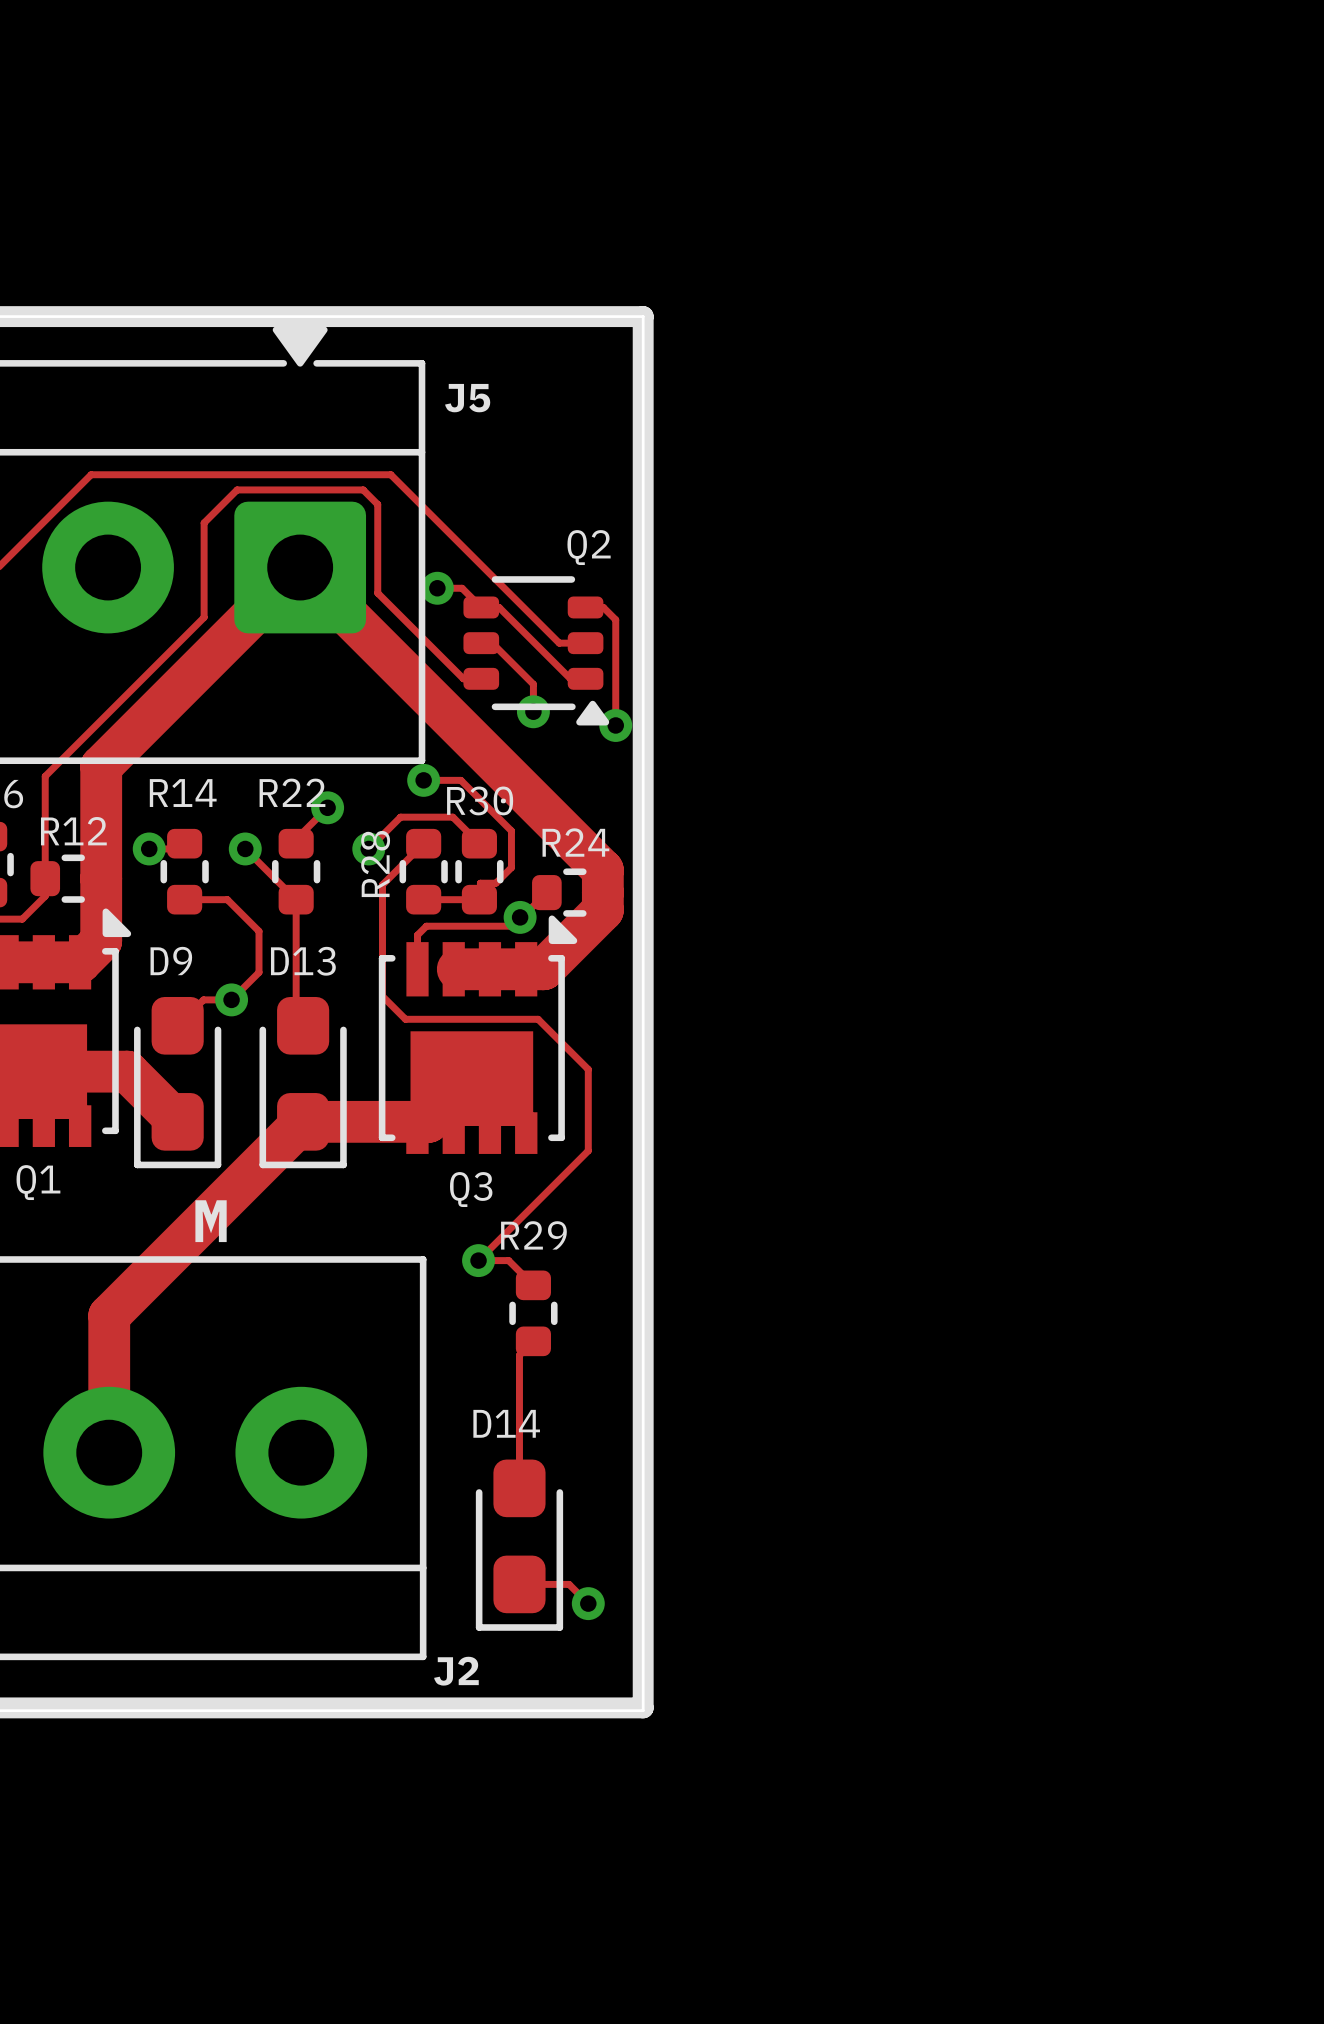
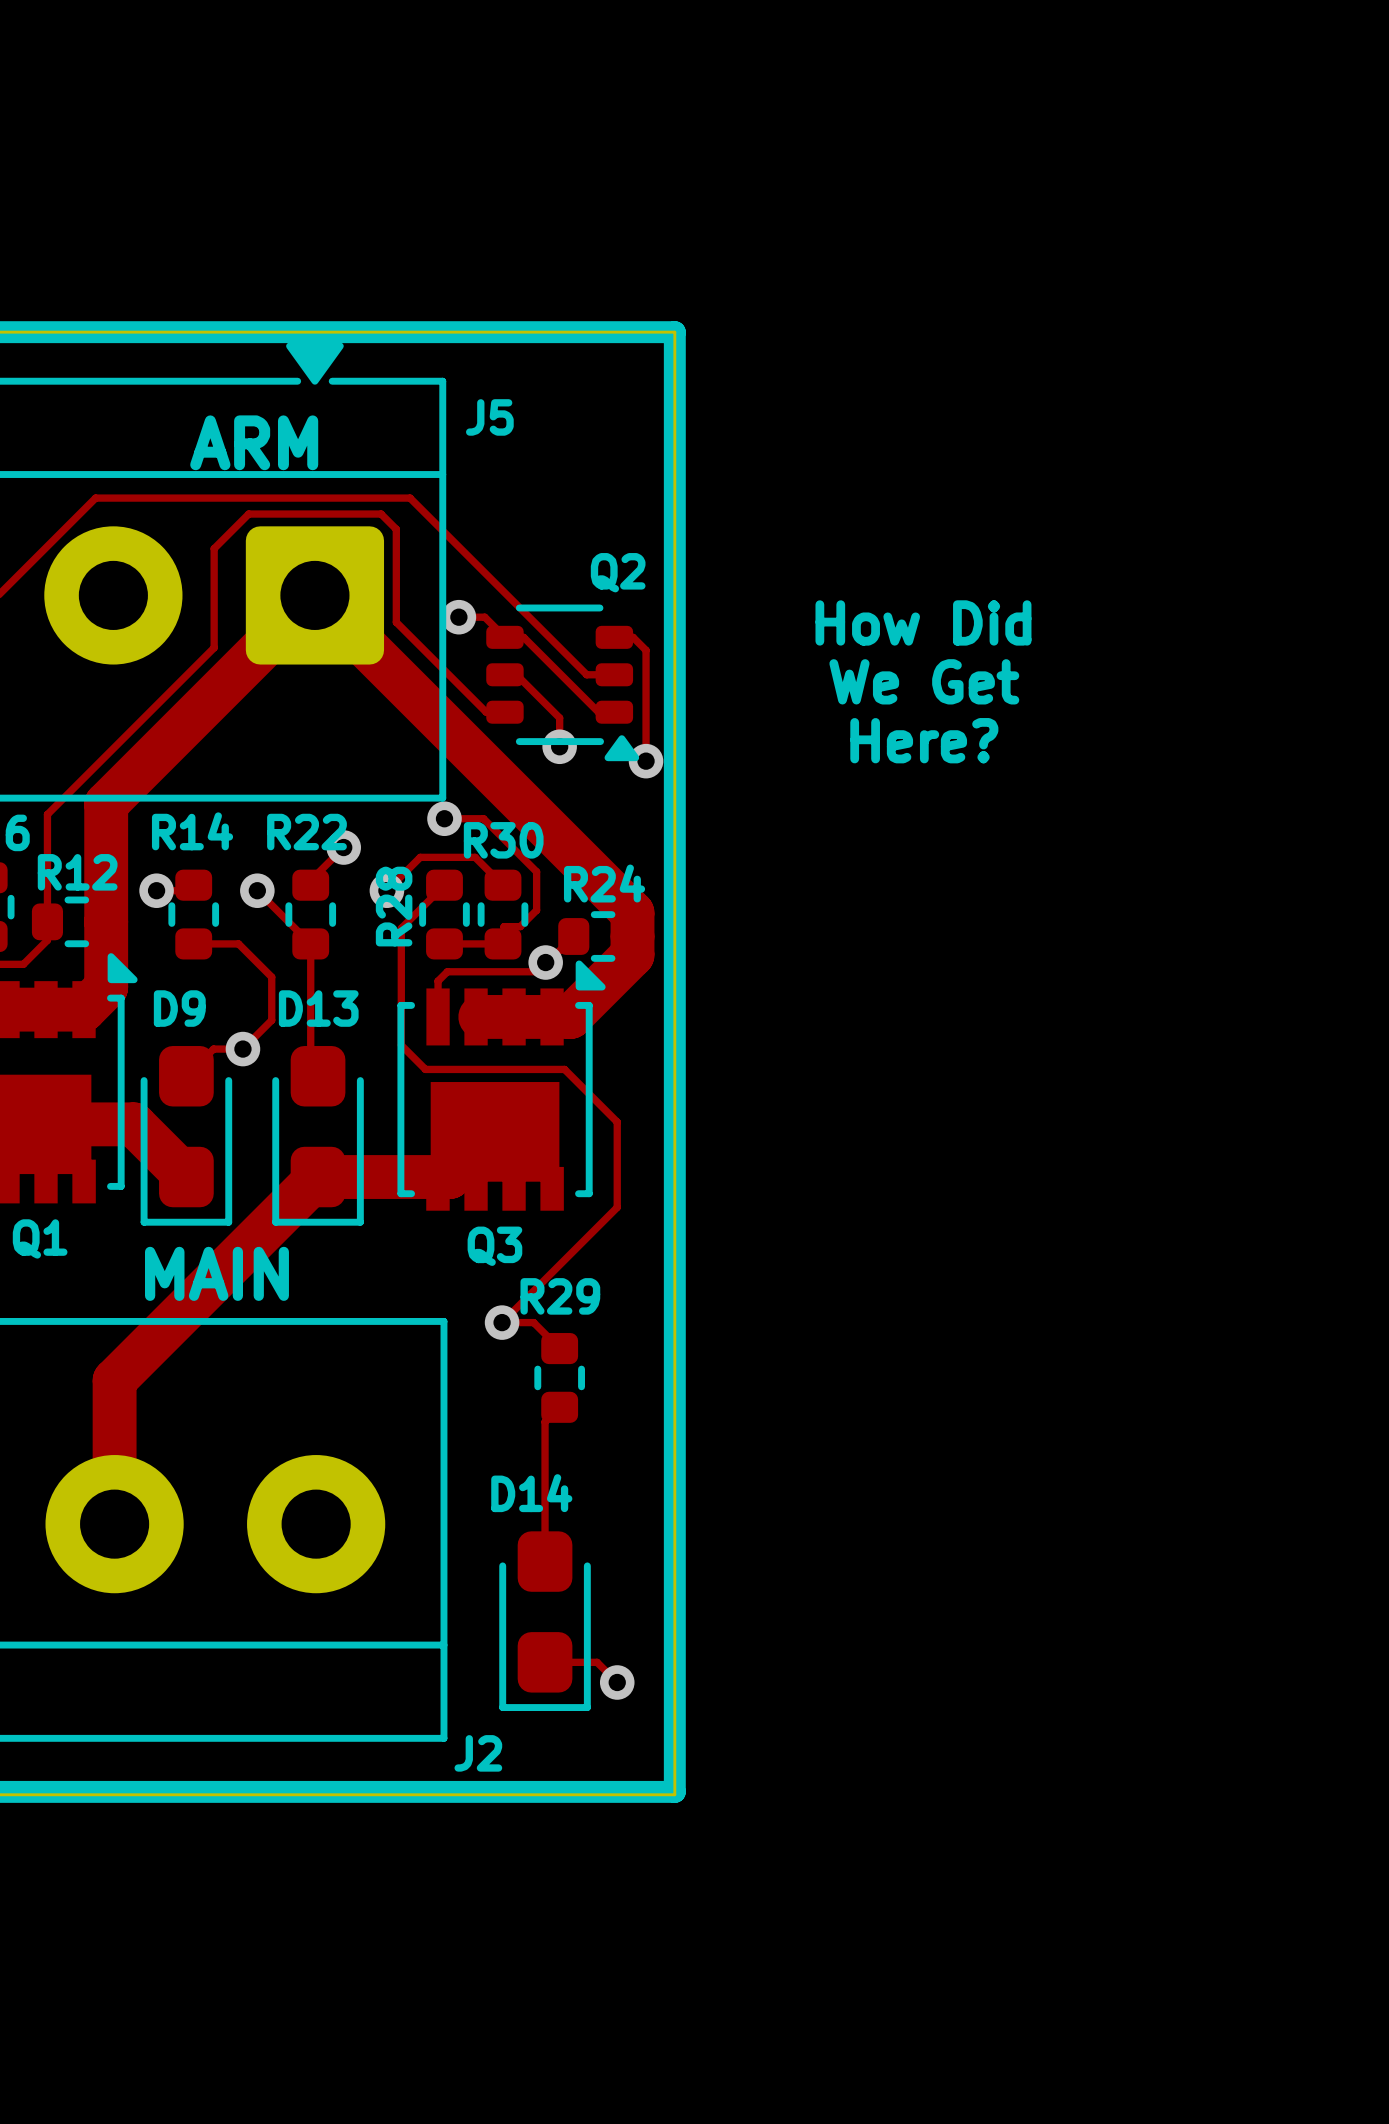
text: none -> ARM (254, 442)
text: none -> How Did (923, 622)
text: none -> We Get (924, 681)
text: none -> Here? (924, 740)
text: M (211, 1221) -> MAIN (216, 1273)

